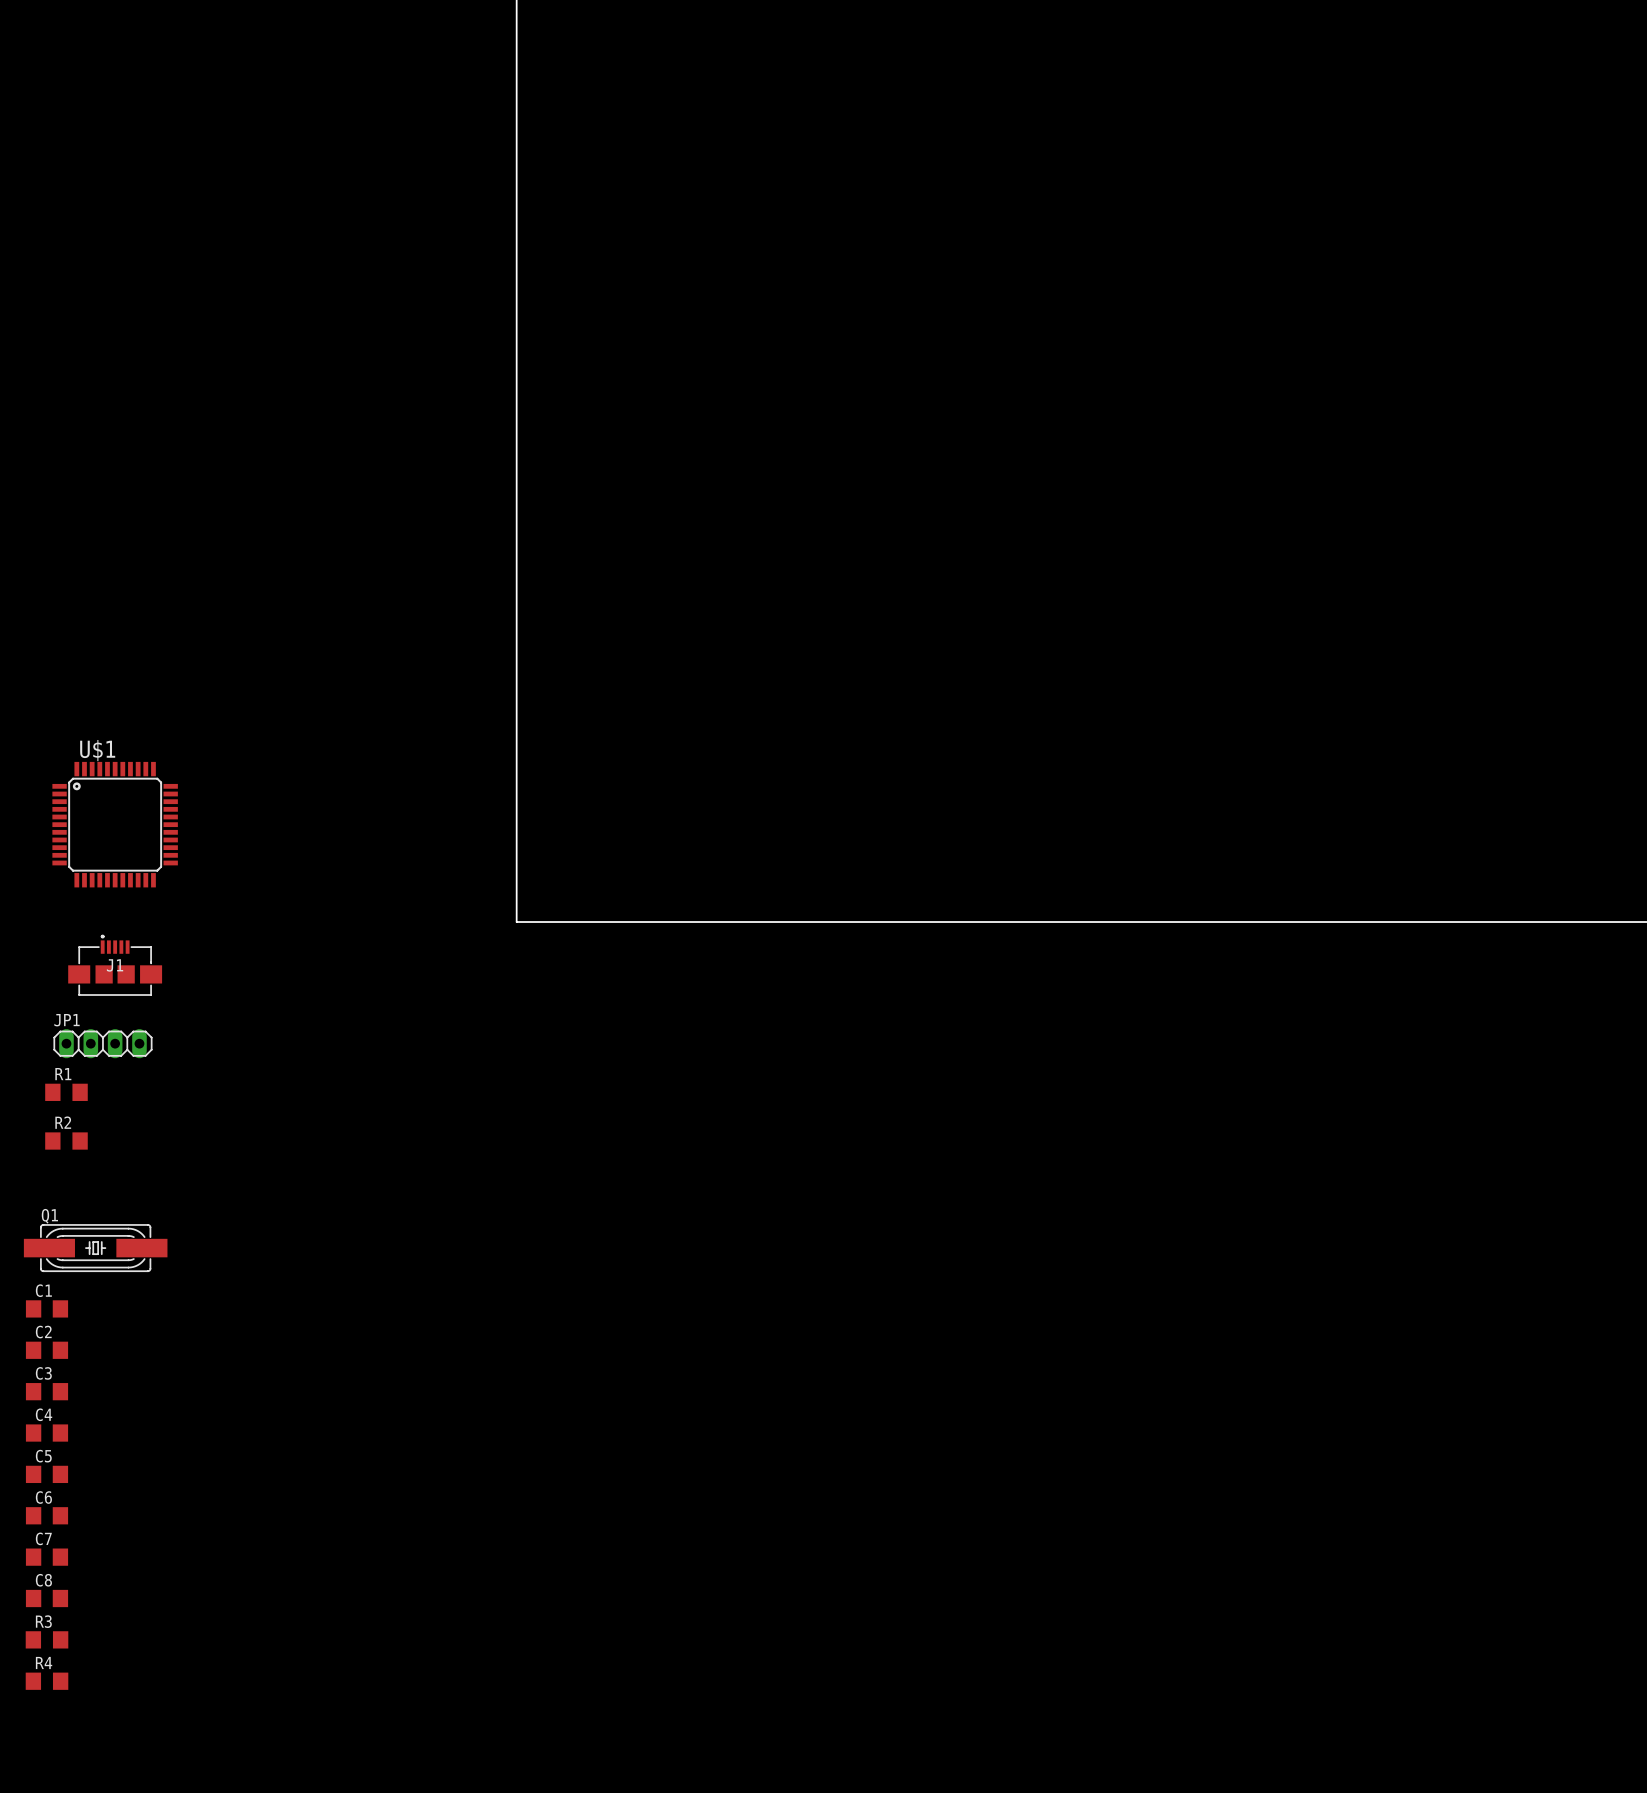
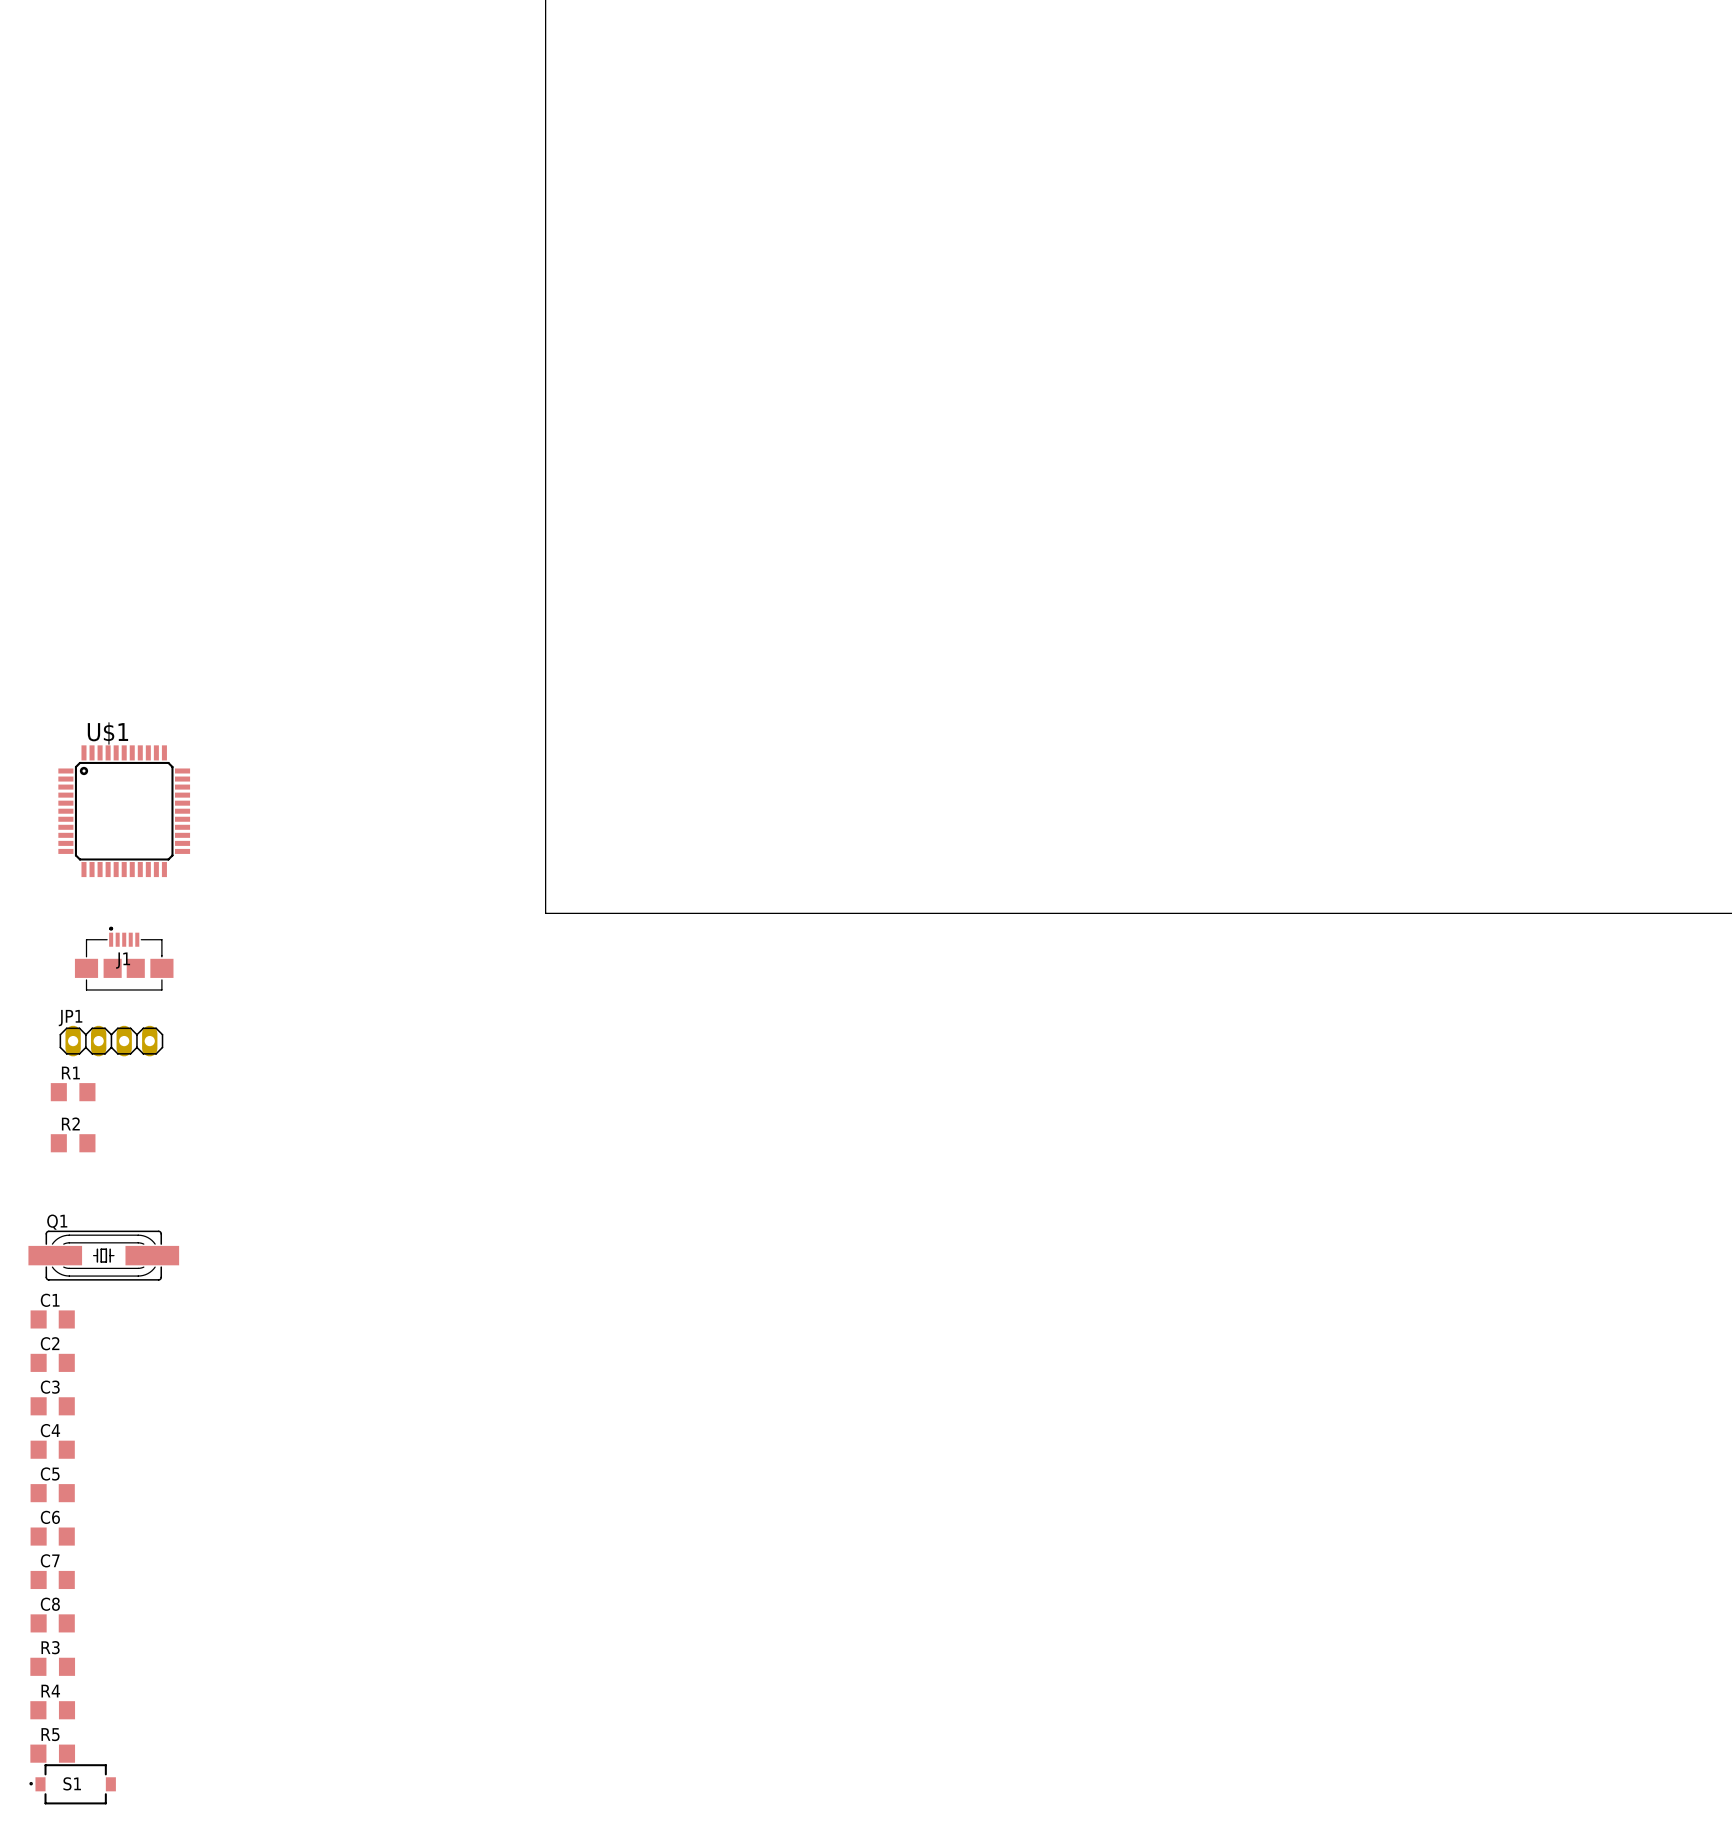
R5: none -> (52, 1753)
S1: none -> (72, 1784)

